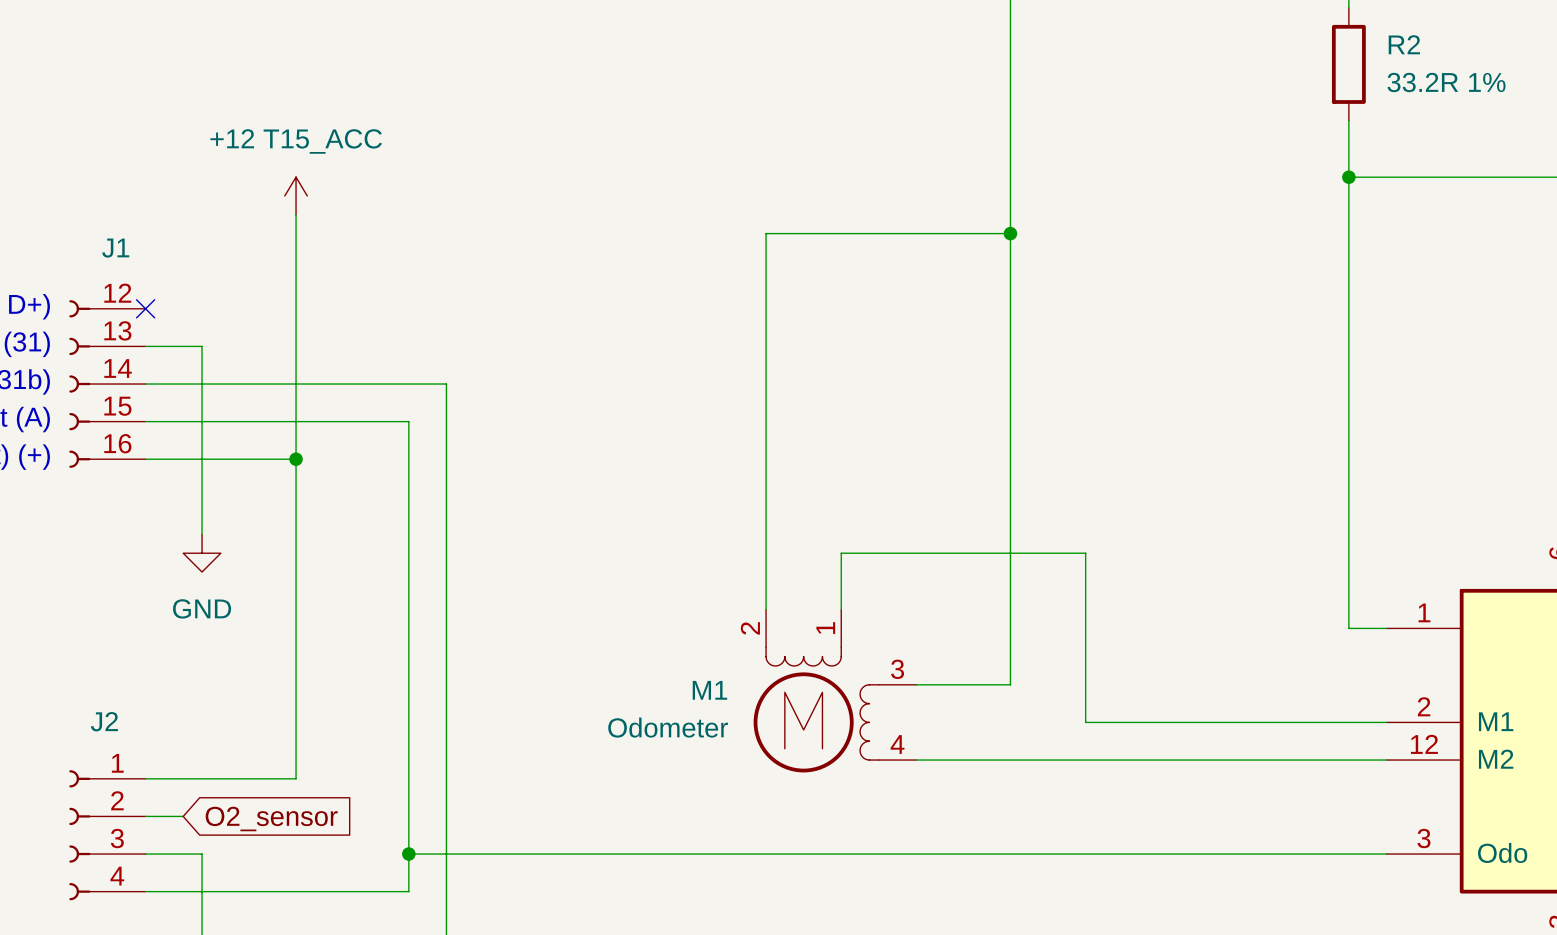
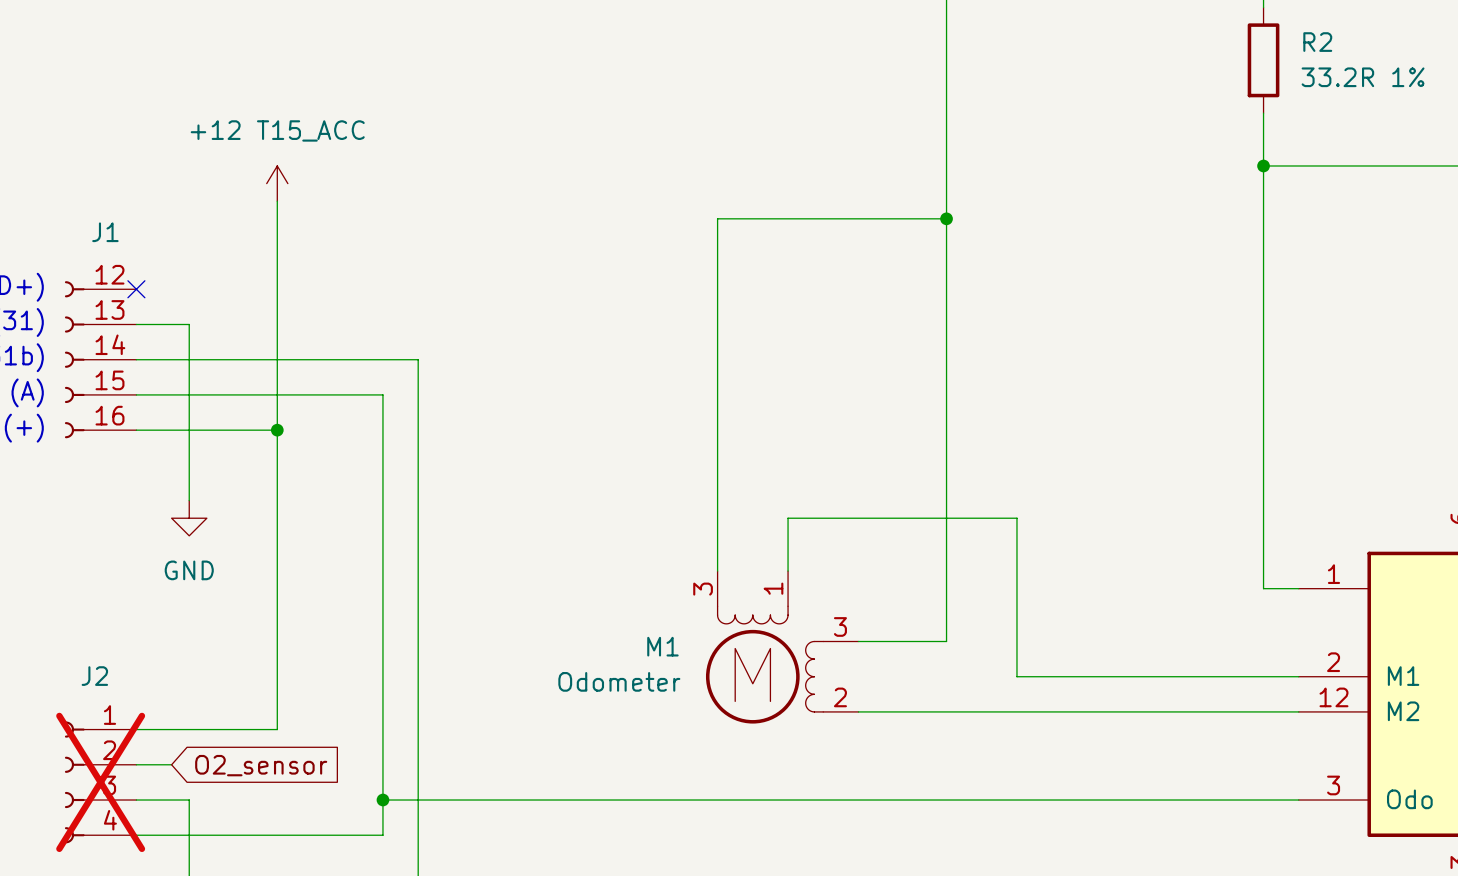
M1 pin number: 2 (750, 628) -> 3 (703, 589)
M1 pin number: 4 (897, 744) -> 2 (840, 697)
J2 do-not-place cross: none -> (100, 782)

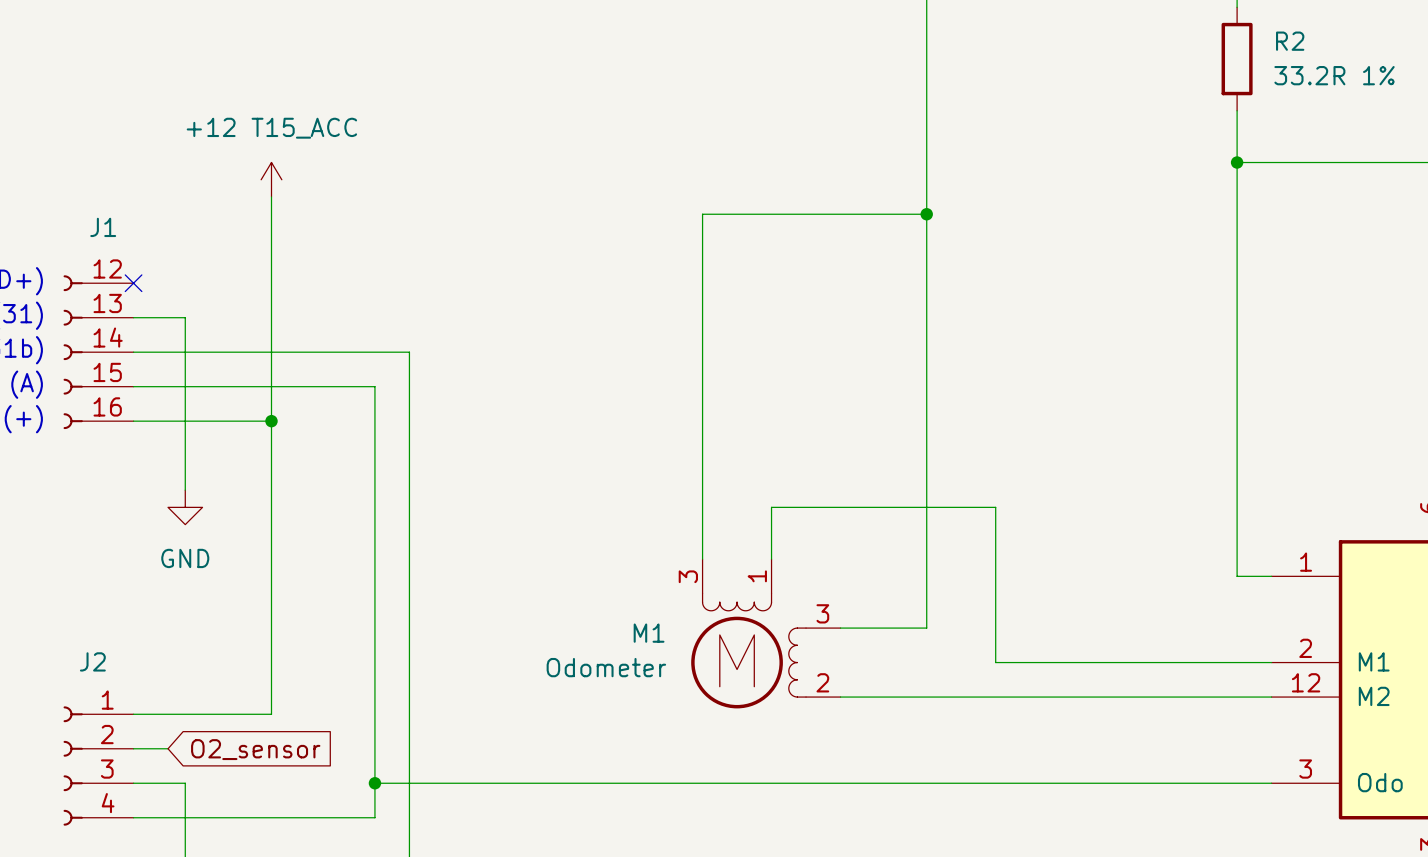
J2 do-not-place cross: (100, 782) -> none

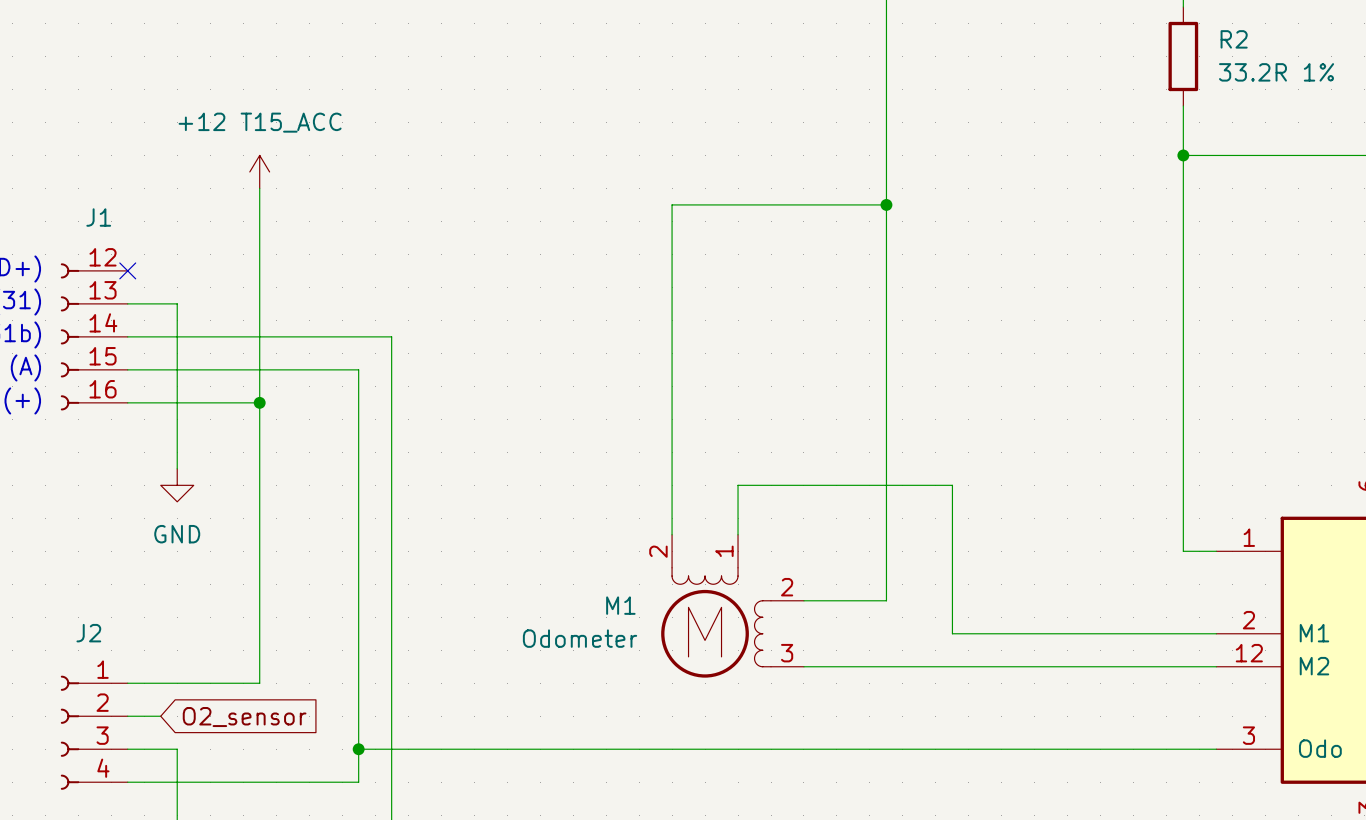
M1 pin number: 3 (688, 576) -> 2 (658, 551)
M1 pin number: 3 (822, 613) -> 2 (787, 587)
M1 pin number: 2 (822, 682) -> 3 (787, 653)

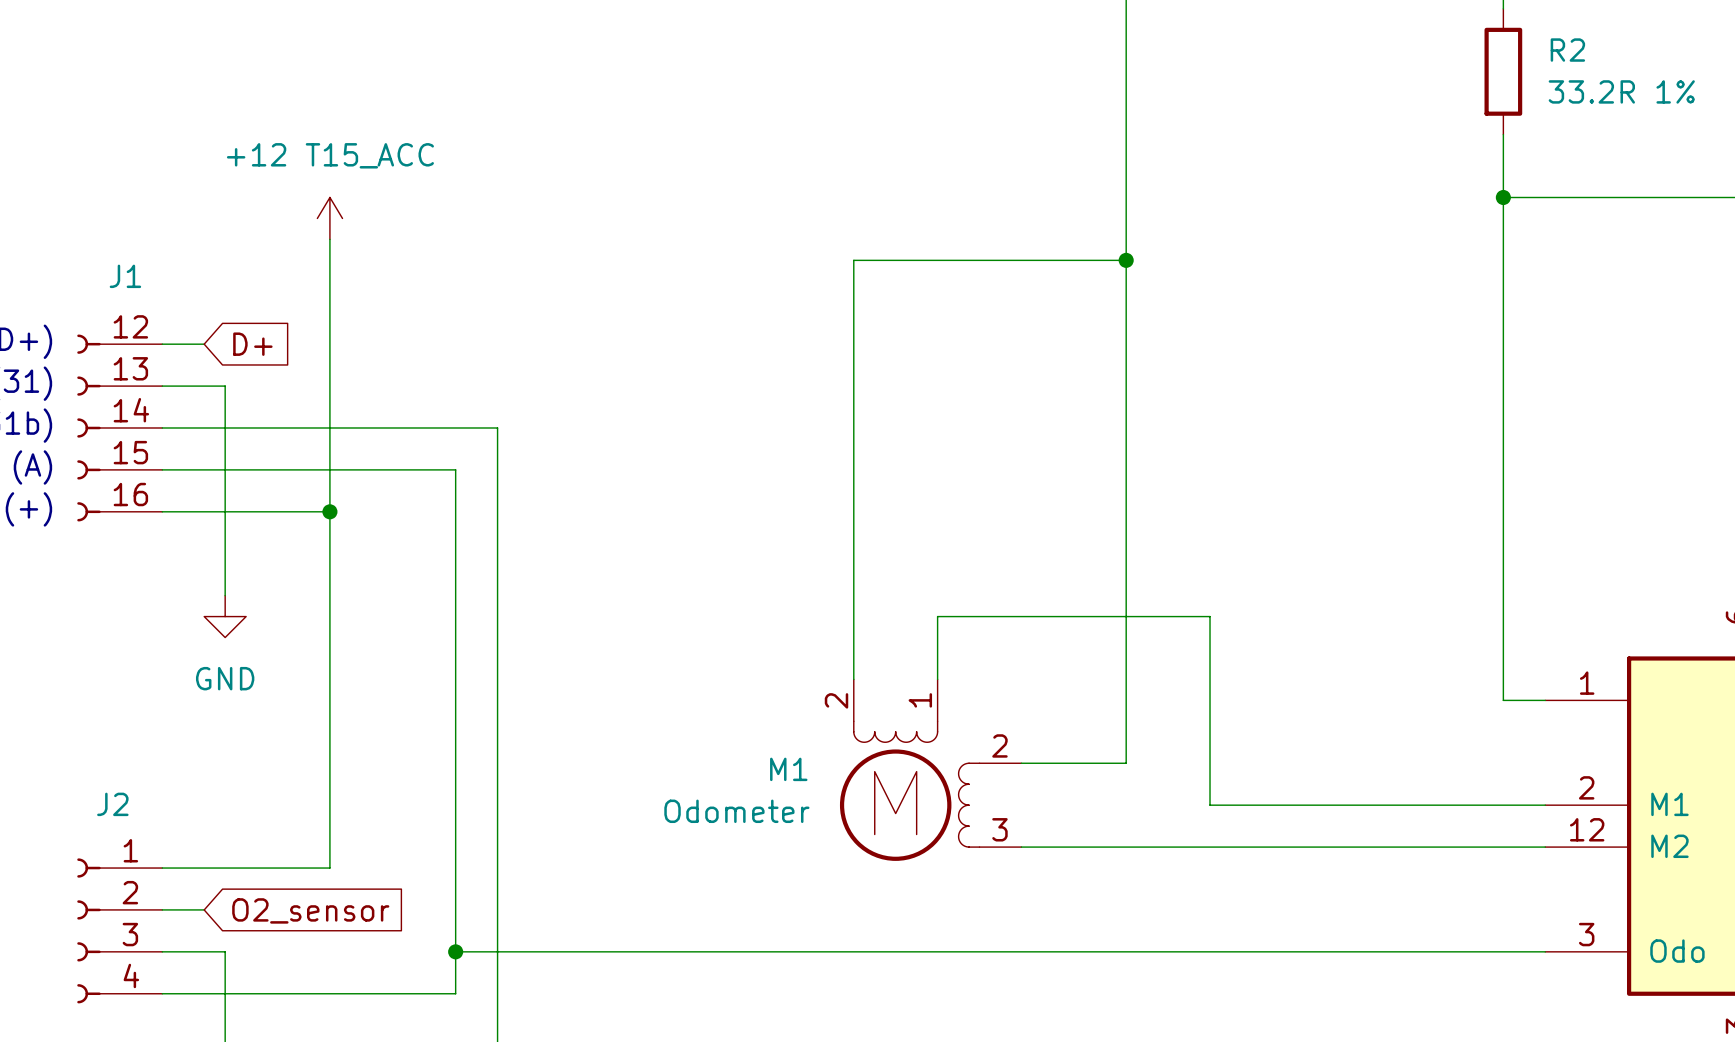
wire: none -> (162, 344) (204, 344)
no-connect mark: (127, 270) -> none
global label: none -> D+ (252, 344)

